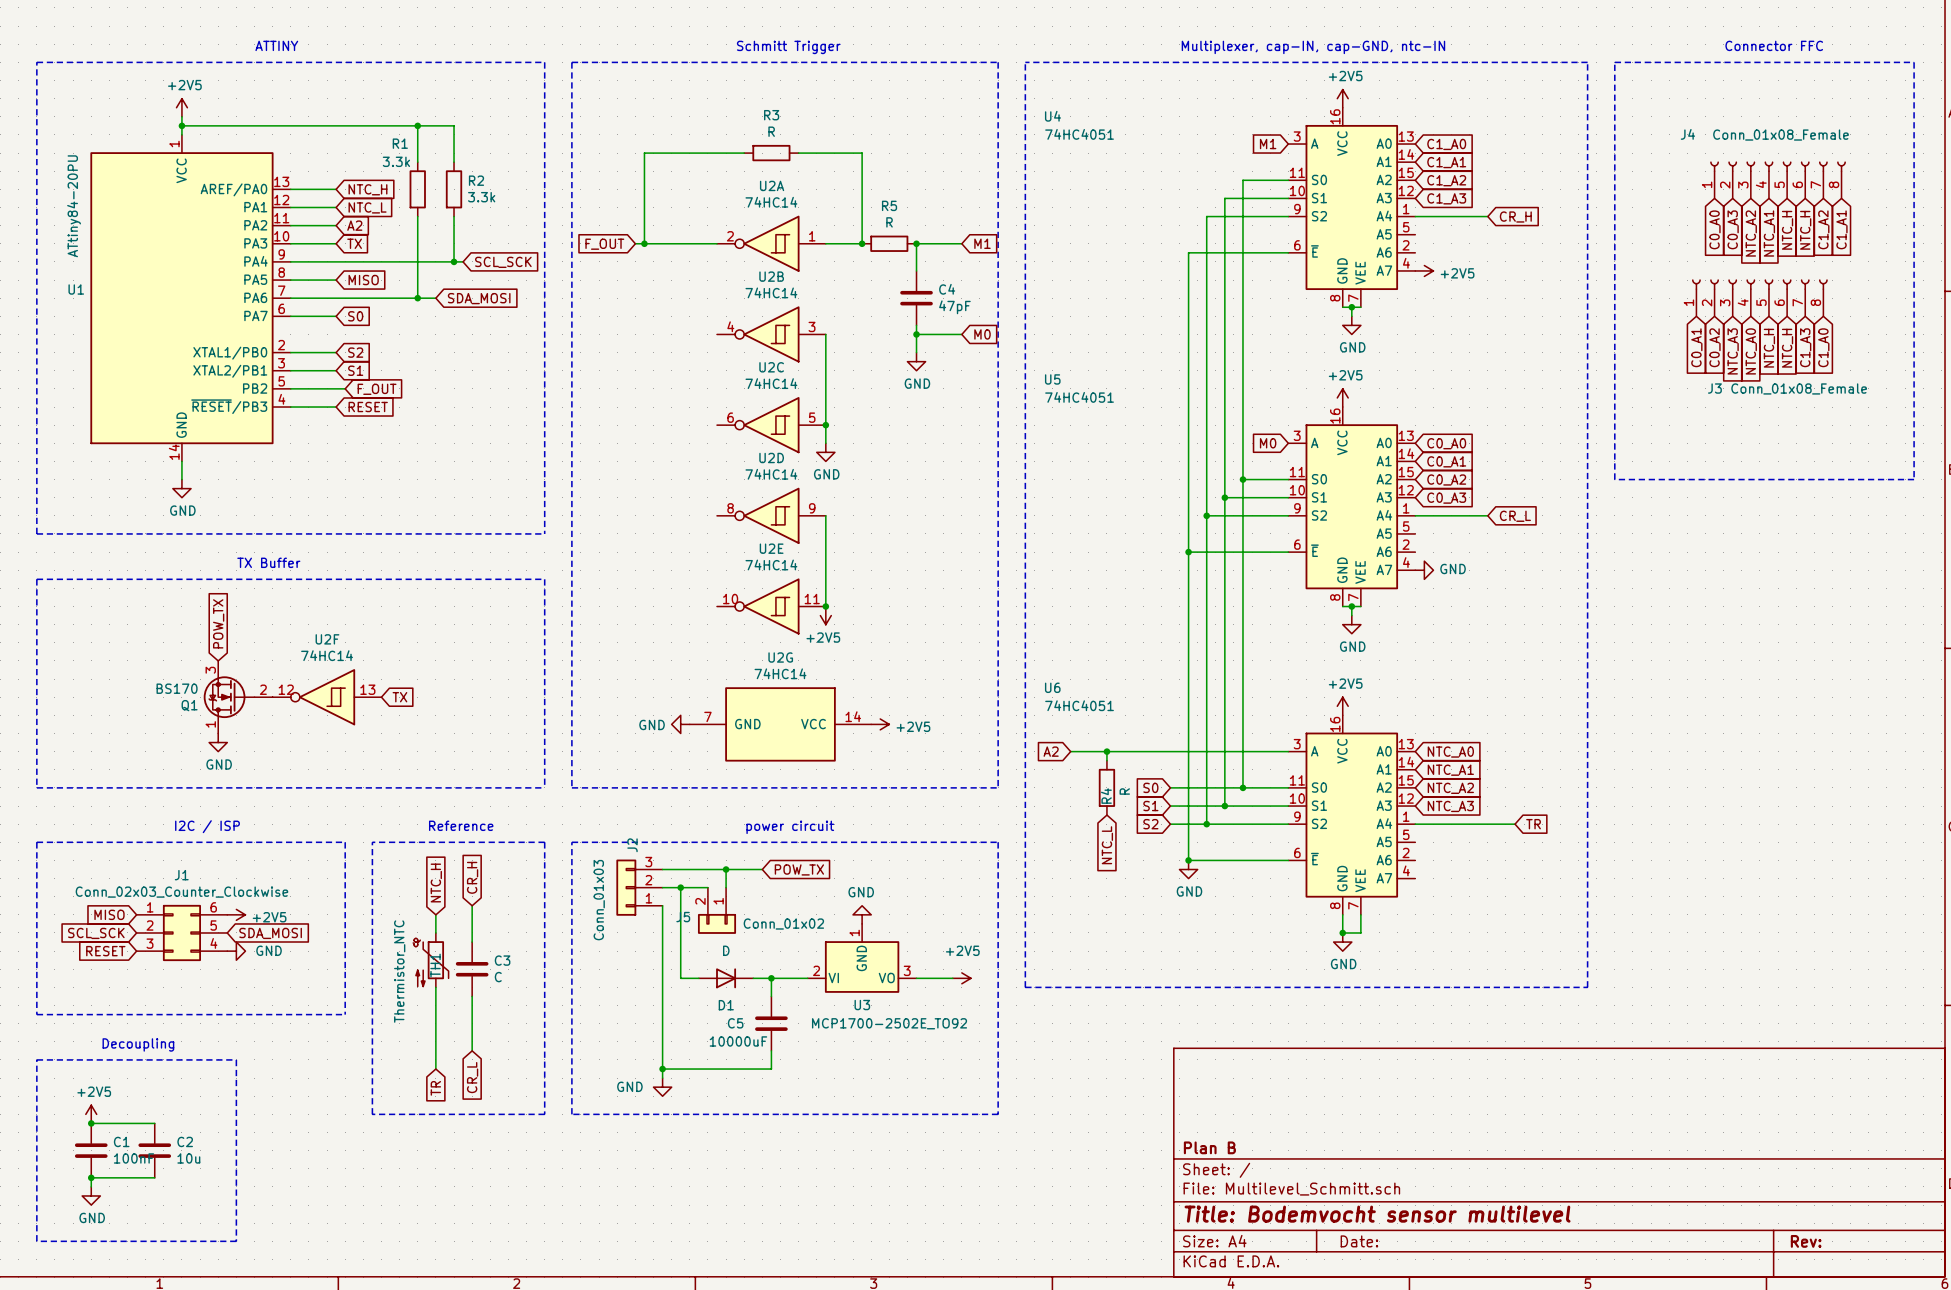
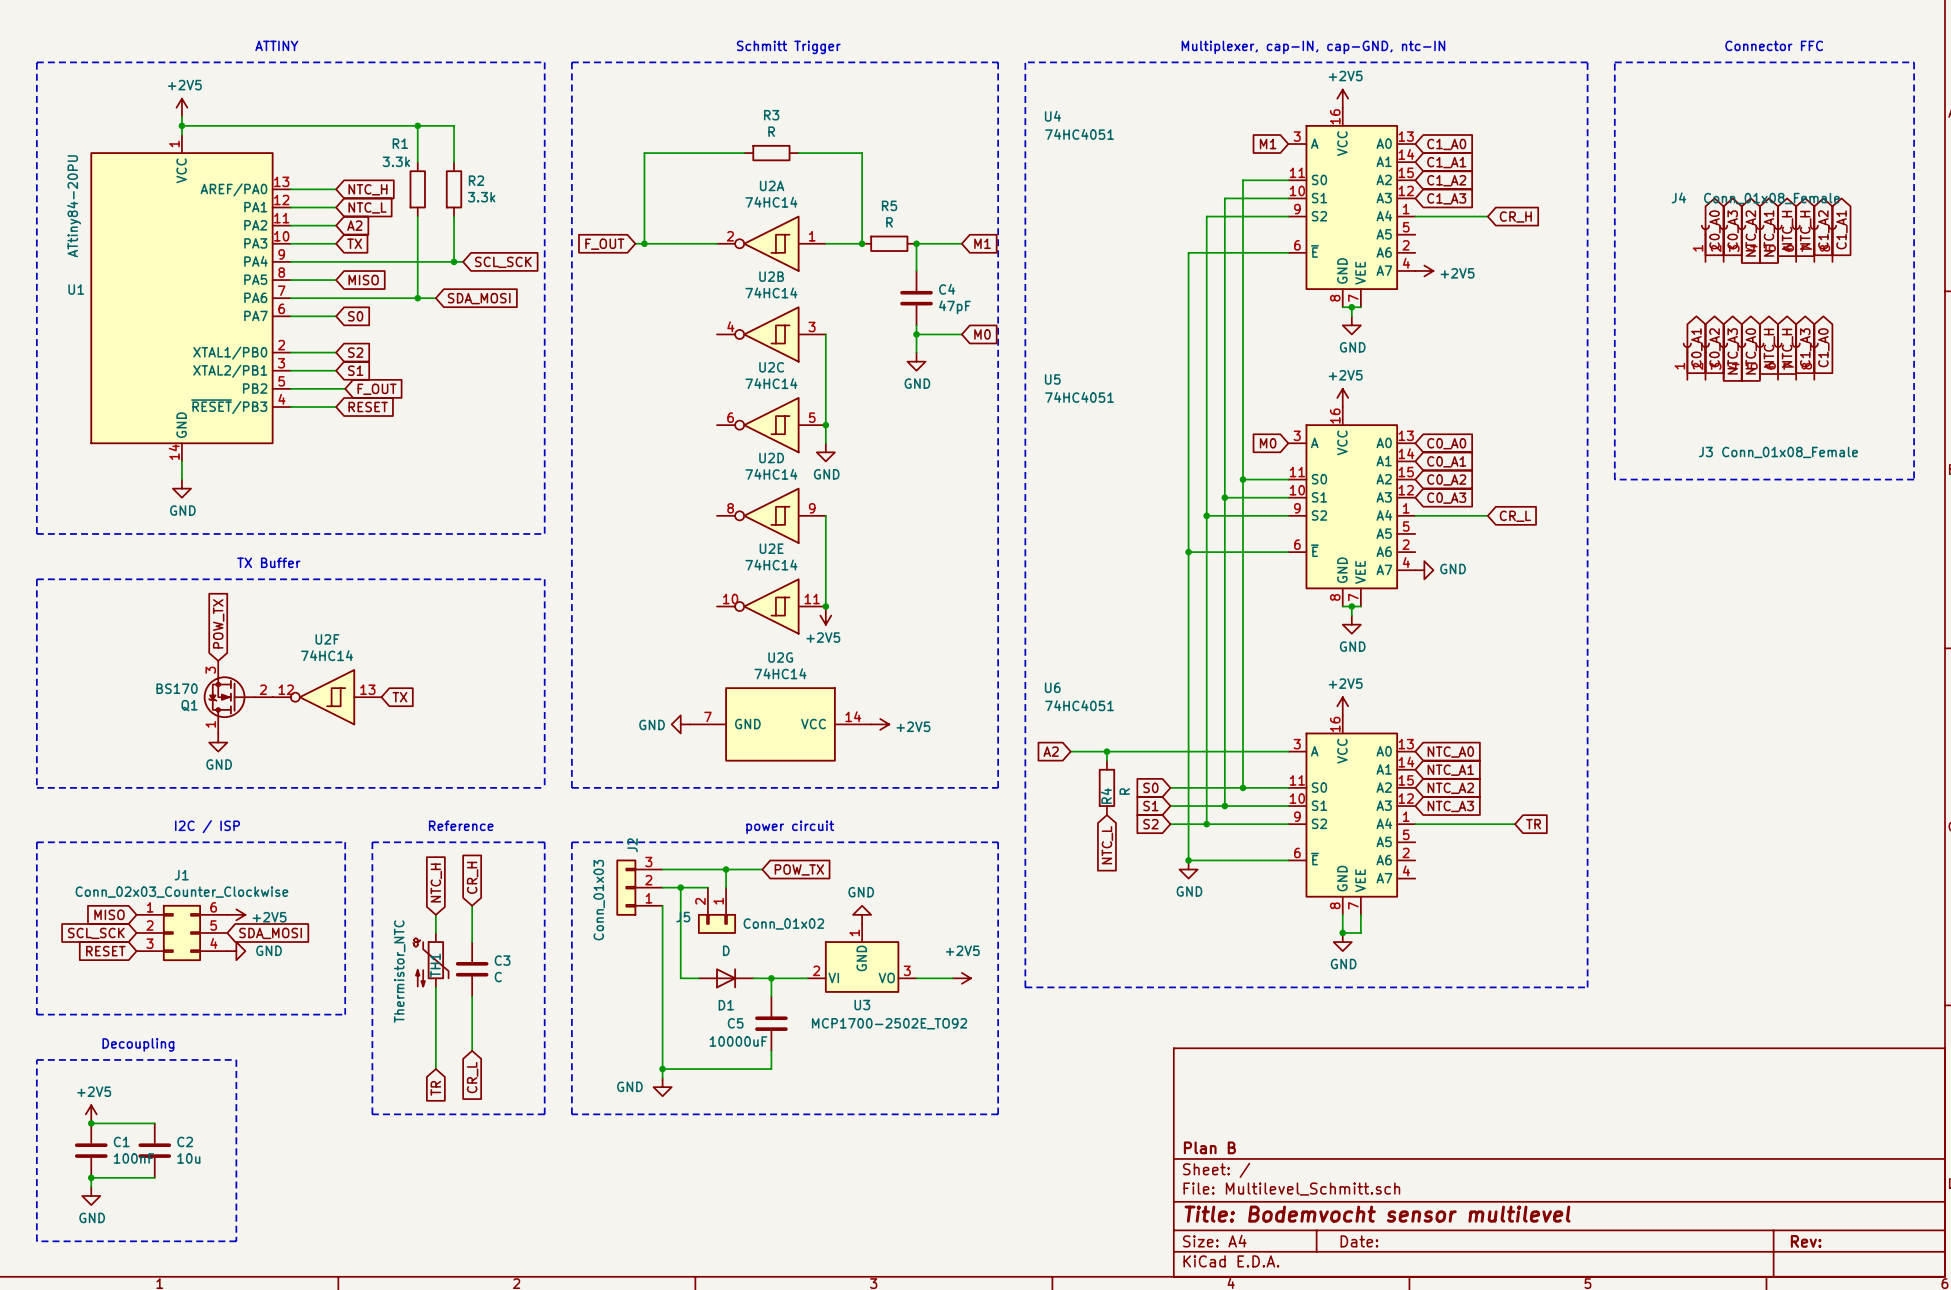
J4 position: (1778, 180) -> (1768, 243)
J3 position: (1759, 297) -> (1750, 361)

